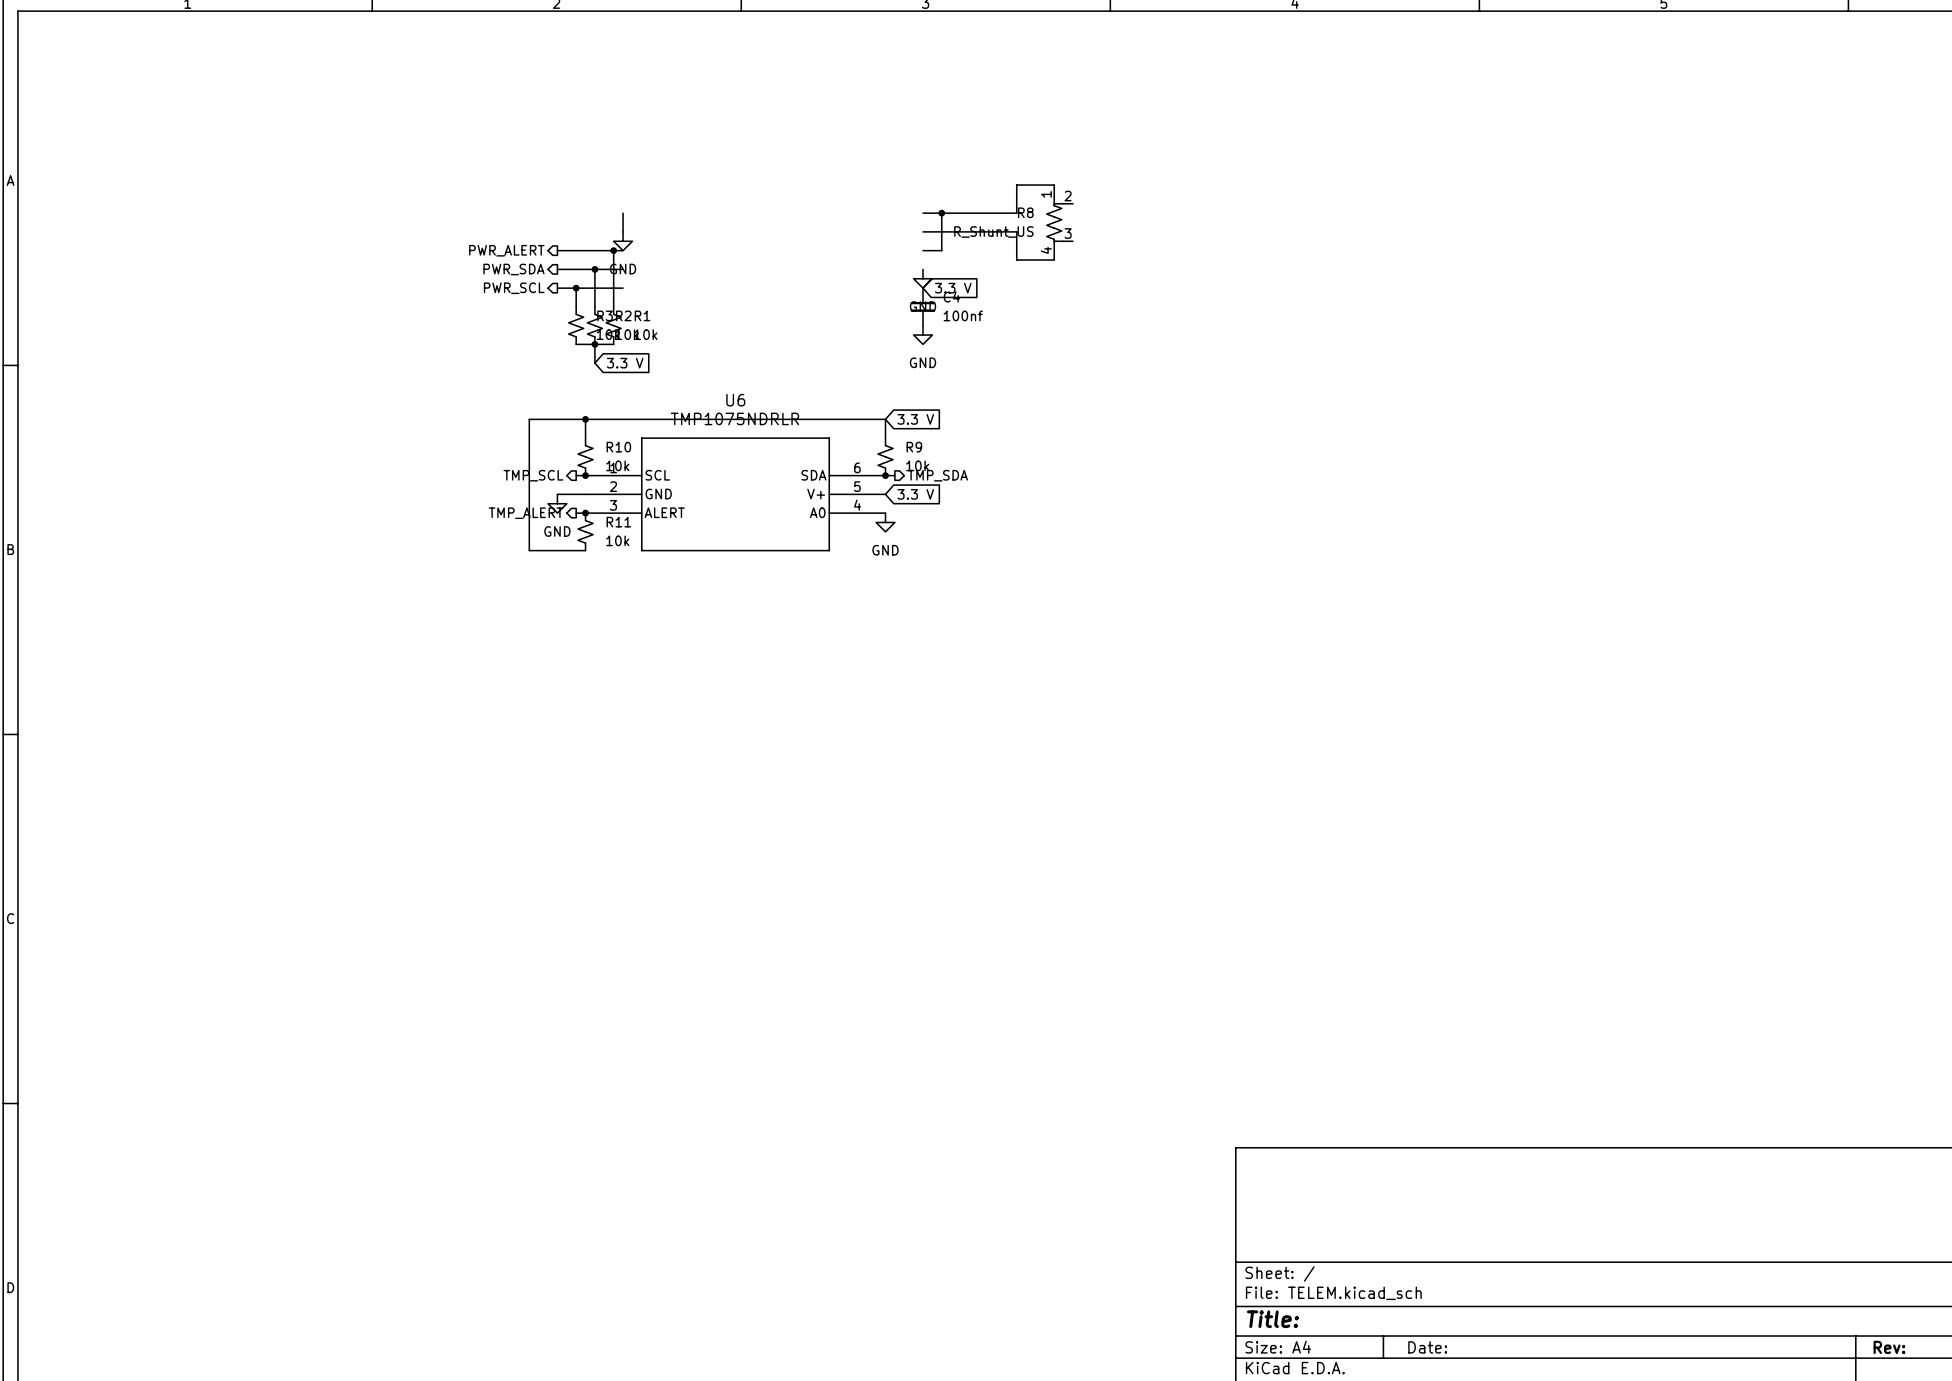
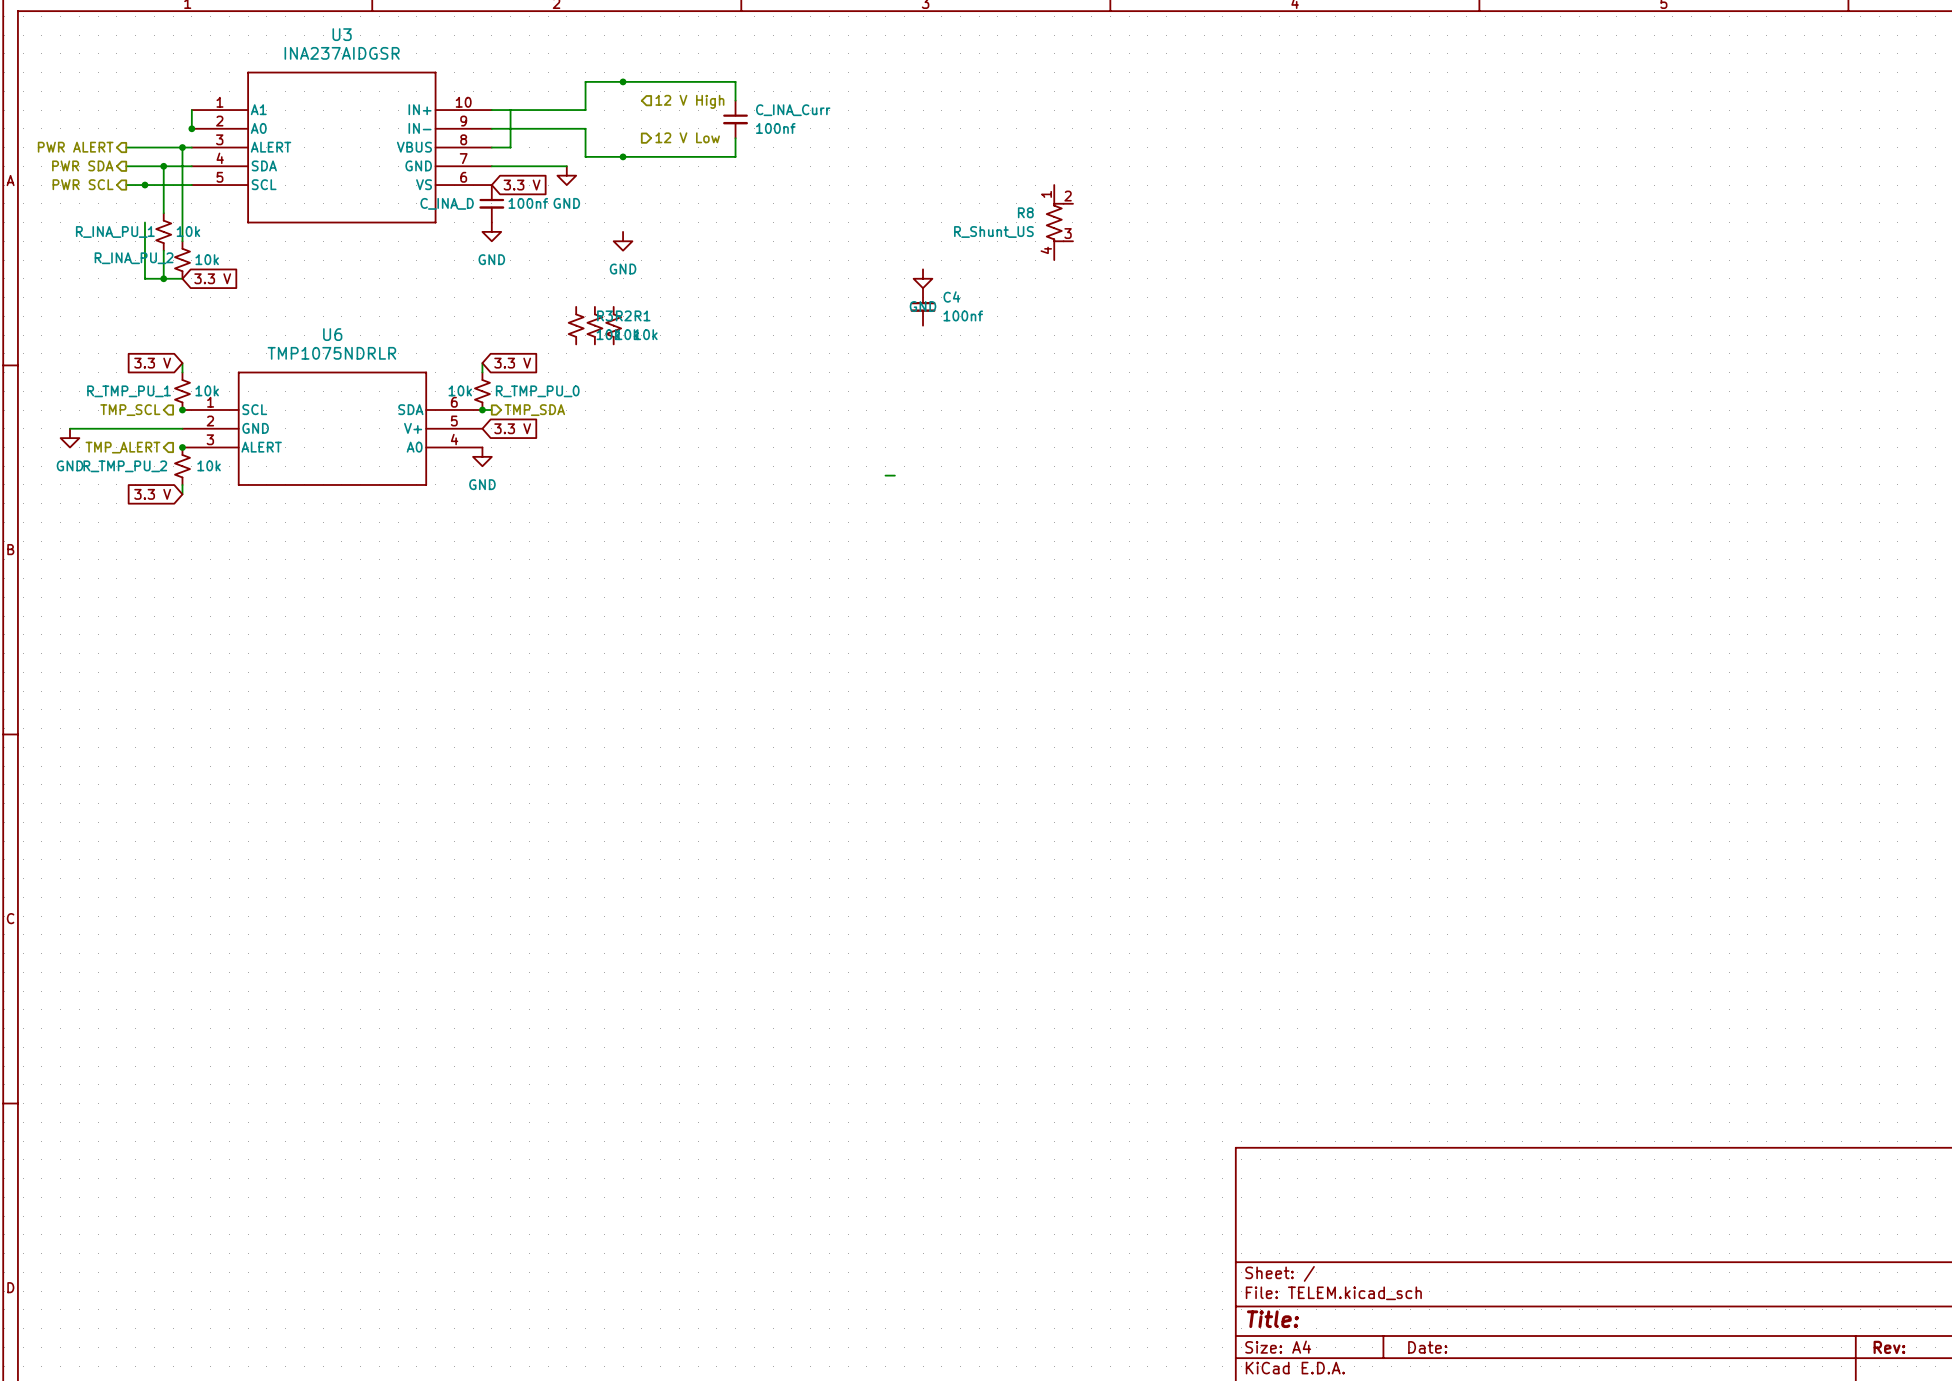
junction: none -> (623, 81)
wire: none -> (735, 100) (735, 81) (585, 81) (585, 110) (491, 110)
hierarchical label: none -> 12 V High (689, 101)
wire: none -> (191, 110) (191, 128)
wire: none -> (510, 110) (510, 147) (491, 147)
C_INA_Curr: none -> 100nf (735, 119)
junction: none -> (191, 128)
wire: none -> (491, 128) (585, 128) (585, 156) (735, 156) (735, 138)
hierarchical label: none -> 12 V Low (687, 137)
hierarchical label: none -> PWR ALERT (75, 147)
wire: none -> (126, 147) (191, 147)
wire: none -> (182, 147) (182, 241)
junction: none -> (182, 147)
U3: none -> INA237AIDGSR (341, 147)
junction: none -> (623, 156)
hierarchical label: none -> PWR SDA (82, 165)
wire: none -> (126, 166) (191, 166)
wire: none -> (163, 166) (163, 213)
junction: none -> (163, 166)
wire: none -> (491, 166) (566, 166)
power symbol: none -> GND (566, 175)
hierarchical label: none -> PWR SCL (83, 184)
wire: none -> (126, 185) (191, 185)
junction: none -> (144, 185)
global label: none -> 3.3 V (522, 185)
wire: (1054, 185) (1016, 185) (1016, 213) (923, 213) -> none
C_INA_D: none -> 100nf (491, 203)
wire: (623, 213) (623, 231) -> none
wire: (941, 213) (941, 250) (923, 250) -> none
junction: (941, 213) -> none
wire: none -> (144, 222) (144, 278) (182, 278)
R_INA_PU_1: none -> 10k (163, 231)
power symbol: none -> GND (491, 231)
wire: (923, 231) (1016, 231) (1016, 260) (1054, 260) -> none
wire: none -> (163, 250) (163, 278)
hierarchical label: PWR_ALERT (506, 250) -> none
wire: (557, 250) (623, 250) -> none
wire: (613, 250) (613, 306) -> none
junction: (613, 250) -> none
R_INA_PU_2: none -> 10k (182, 260)
hierarchical label: PWR_SDA (513, 269) -> none
wire: (557, 269) (623, 269) -> none
wire: (594, 269) (594, 306) -> none
junction: (594, 269) -> none
junction: none -> (163, 278)
global label: none -> 3.3 V (212, 278)
hierarchical label: PWR_SCL (514, 288) -> none
wire: (557, 288) (623, 288) -> none
wire: (576, 288) (576, 306) -> none
junction: (576, 288) -> none
global label: 3.3 V (953, 288) -> none
power symbol: GND (923, 335) -> none
wire: (576, 344) (613, 344) -> none
wire: (594, 344) (594, 363) -> none
junction: (594, 344) -> none
global label: none -> 3.3 V (152, 363)
wire: none -> (182, 363) (182, 372)
wire: none -> (482, 363) (482, 372)
global label: none -> 3.3 V (512, 363)
global label: 3.3 V (625, 363) -> none
R_TMP_PU_1: none -> 10k (182, 391)
R_TMP_PU_0: none -> 10k (482, 391)
hierarchical label: none -> TMP_SCL (130, 410)
junction: none -> (182, 410)
junction: none -> (482, 410)
hierarchical label: none -> TMP_SDA (534, 410)
wire: (585, 419) (585, 438) -> none
junction: (585, 419) -> none
global label: 3.3 V (915, 419) -> none
wire: none -> (69, 428) (182, 428)
global label: none -> 3.3 V (512, 428)
power symbol: none -> GND (69, 438)
wire: (885, 438) (885, 419) (529, 419) (529, 550) (585, 550) -> none
hierarchical label: none -> TMP_ALERT (122, 447)
junction: none -> (182, 447)
R10: 10k (585, 456) -> none
R9: 10k (885, 456) -> none
R_TMP_PU_2: none -> 10k (182, 466)
hierarchical label: TMP_SCL (533, 475) -> none
wire: (576, 475) (585, 475) -> (482, 410) (491, 410)
junction: (585, 475) -> none
junction: (885, 475) -> none
hierarchical label: TMP_SDA (937, 475) -> none
wire: none -> (182, 484) (182, 494)
global label: none -> 3.3 V (152, 494)
wire: (557, 494) (585, 494) -> none
U6 position: (735, 494) -> (332, 428)
global label: 3.3 V (915, 494) -> none
power symbol position: GND (557, 503) -> GND (482, 456)
hierarchical label: TMP_ALERT (526, 513) -> none
wire: (576, 513) (585, 513) -> none
junction: (585, 513) -> none
power symbol: GND (885, 522) -> none
R11: 10k (585, 531) -> none

